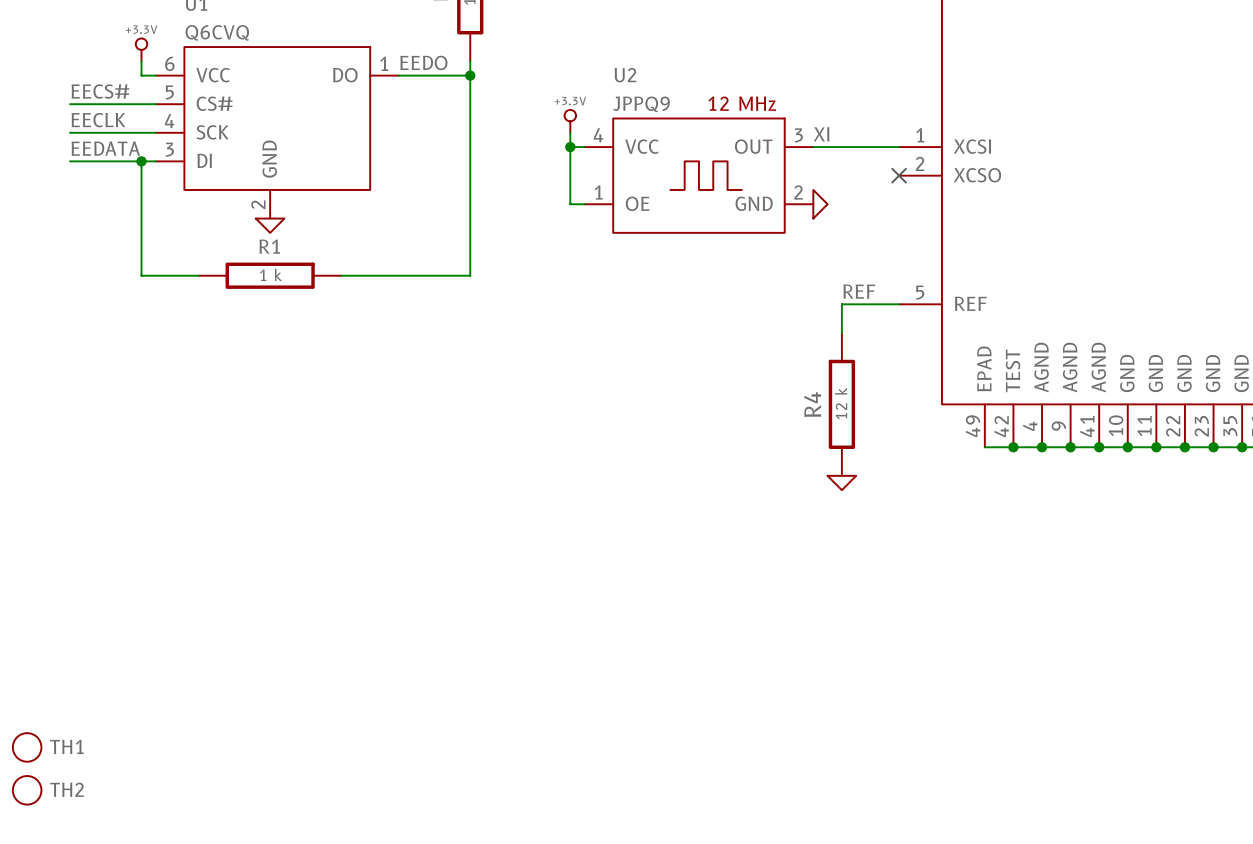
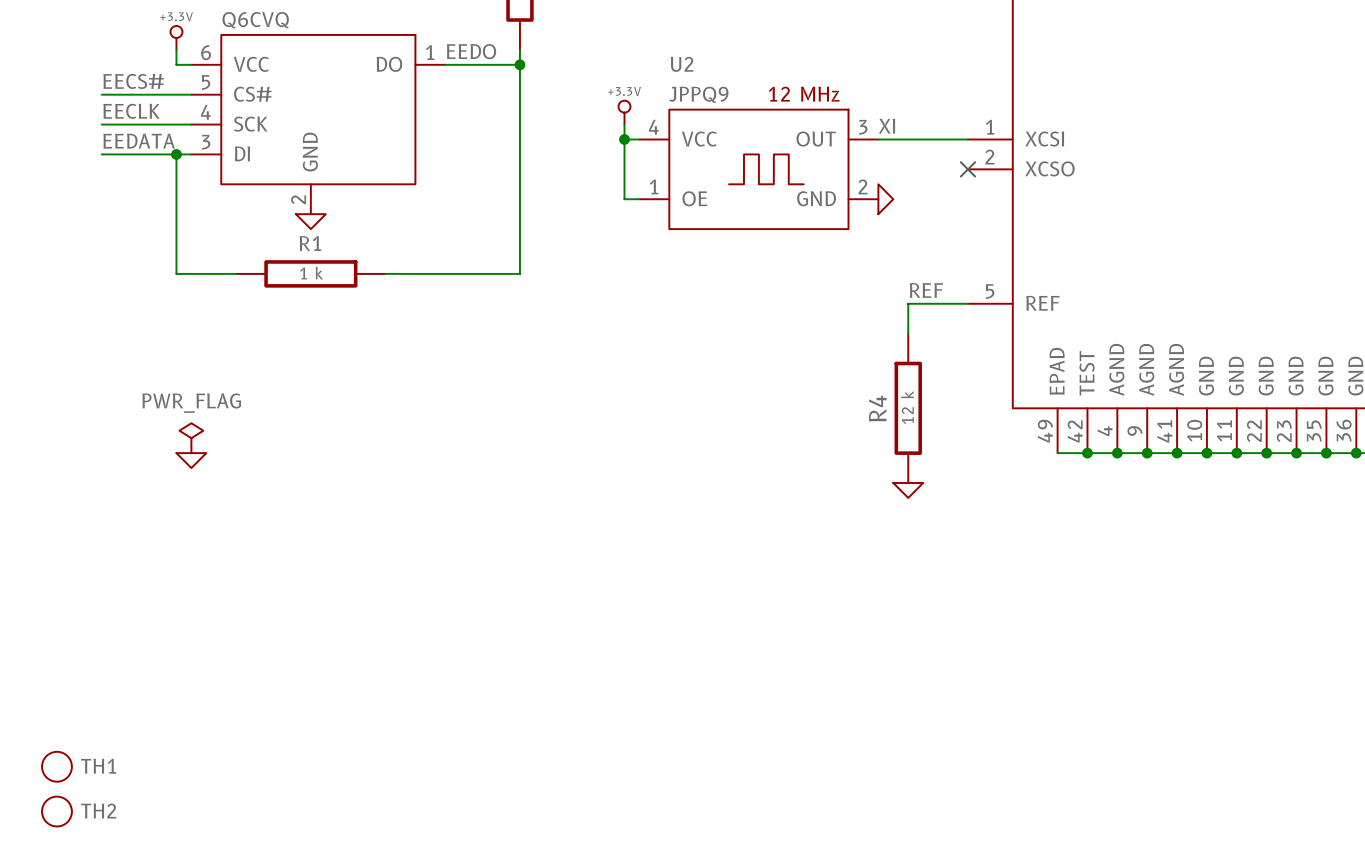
power symbol: none -> PWR_FLAG (191, 438)
power symbol: none -> (191, 460)

